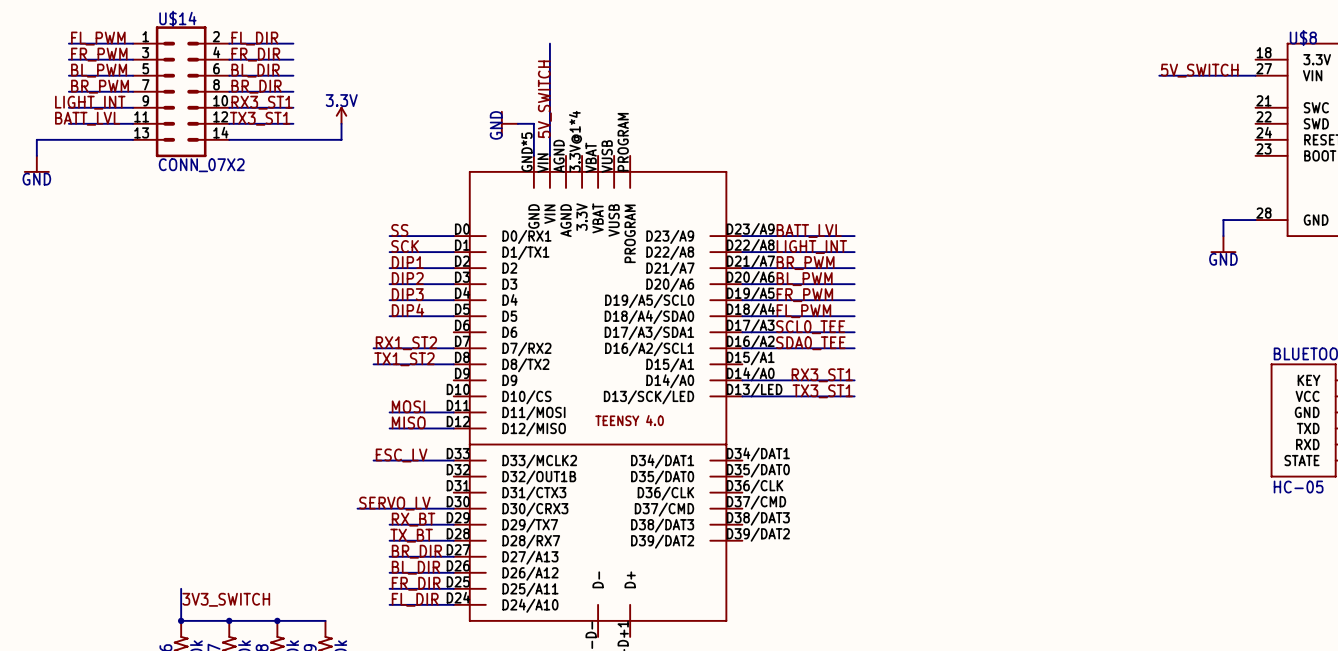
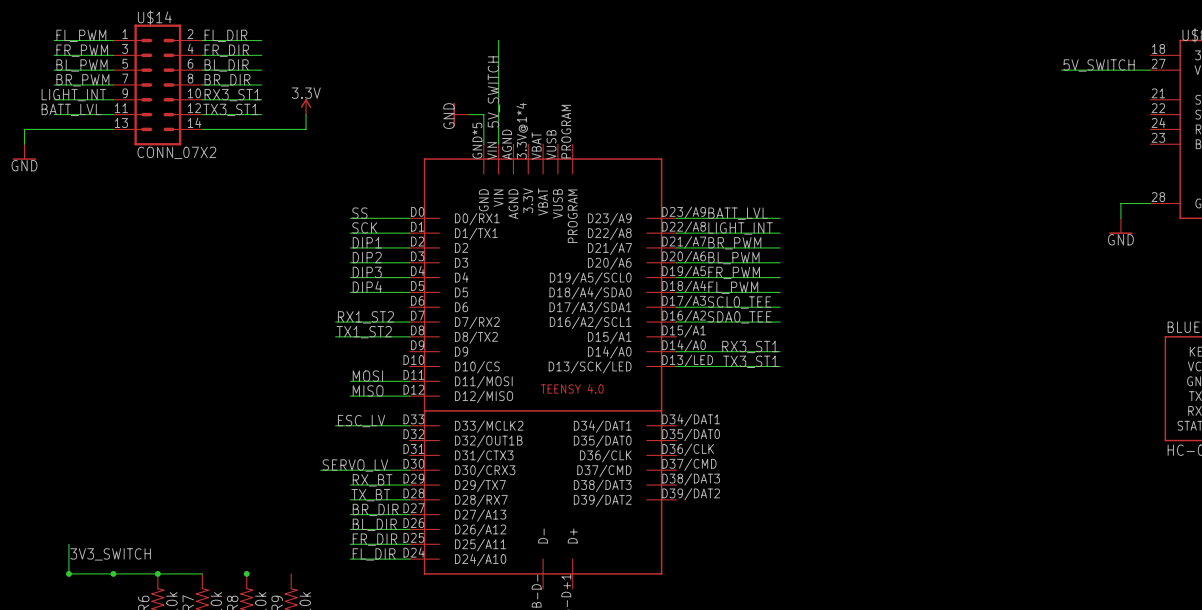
wire: (181, 588) (181, 620) -> (68, 544) (68, 573) (157, 573)
label position: 3V3_SWITCH (226, 599) -> 3V3_SWITCH (110, 554)
junction: none -> (68, 573)
junction: none -> (113, 573)
wire: (229, 620) (325, 620) -> none
junction: (229, 620) -> none

